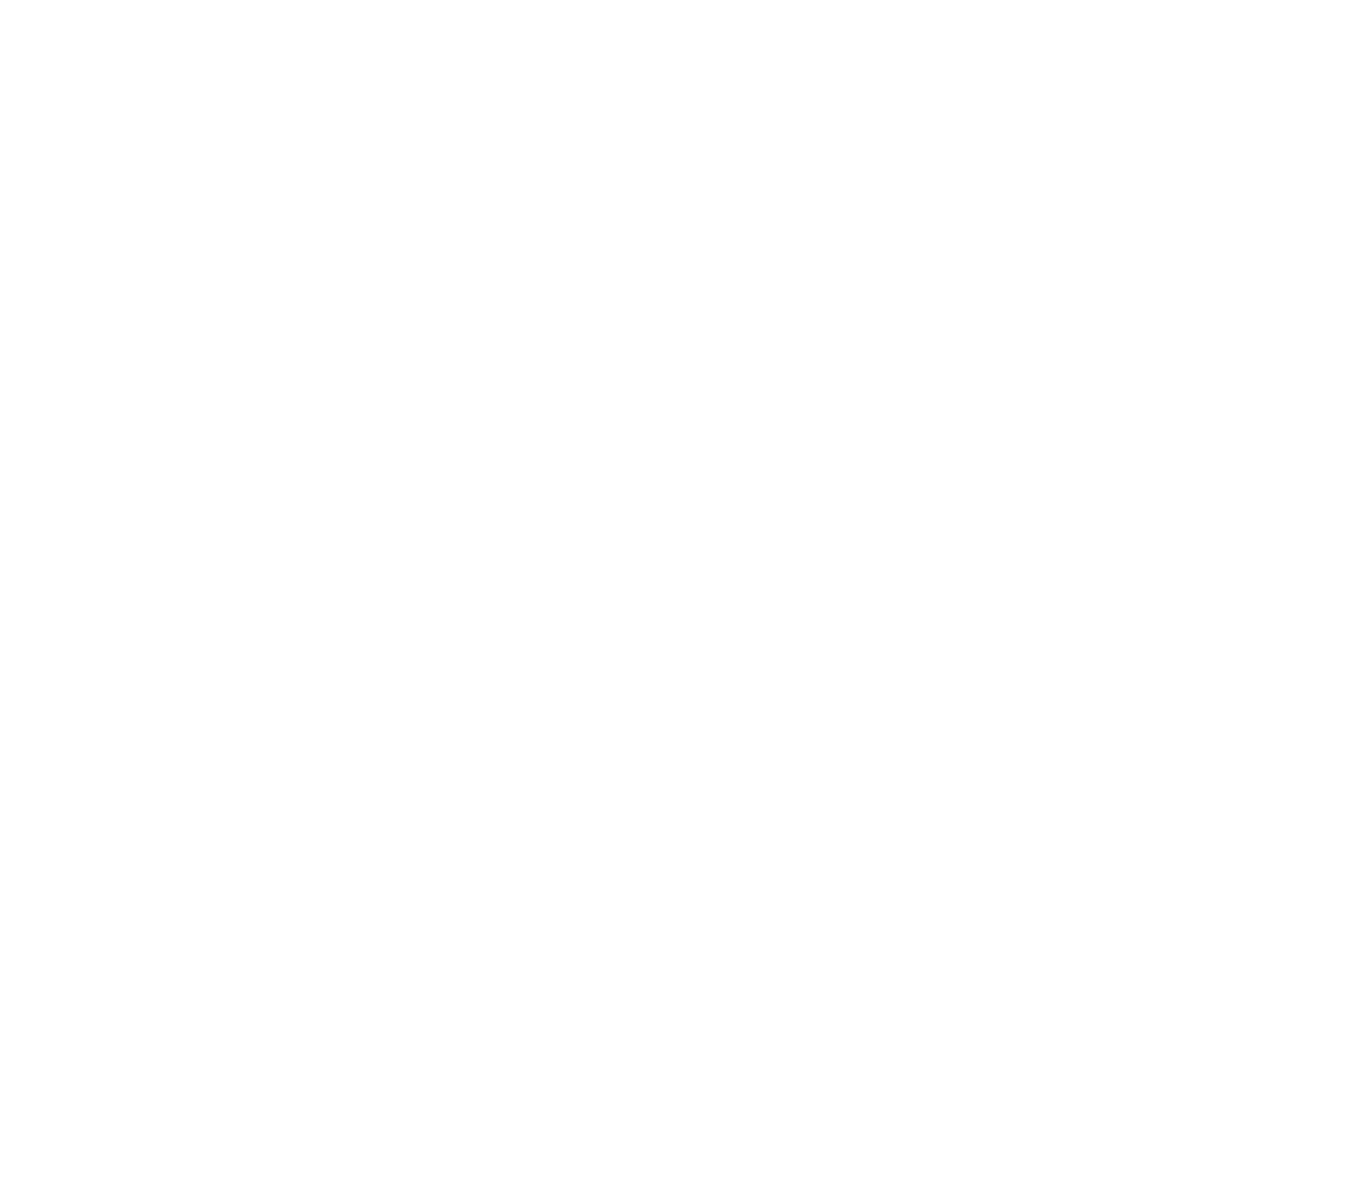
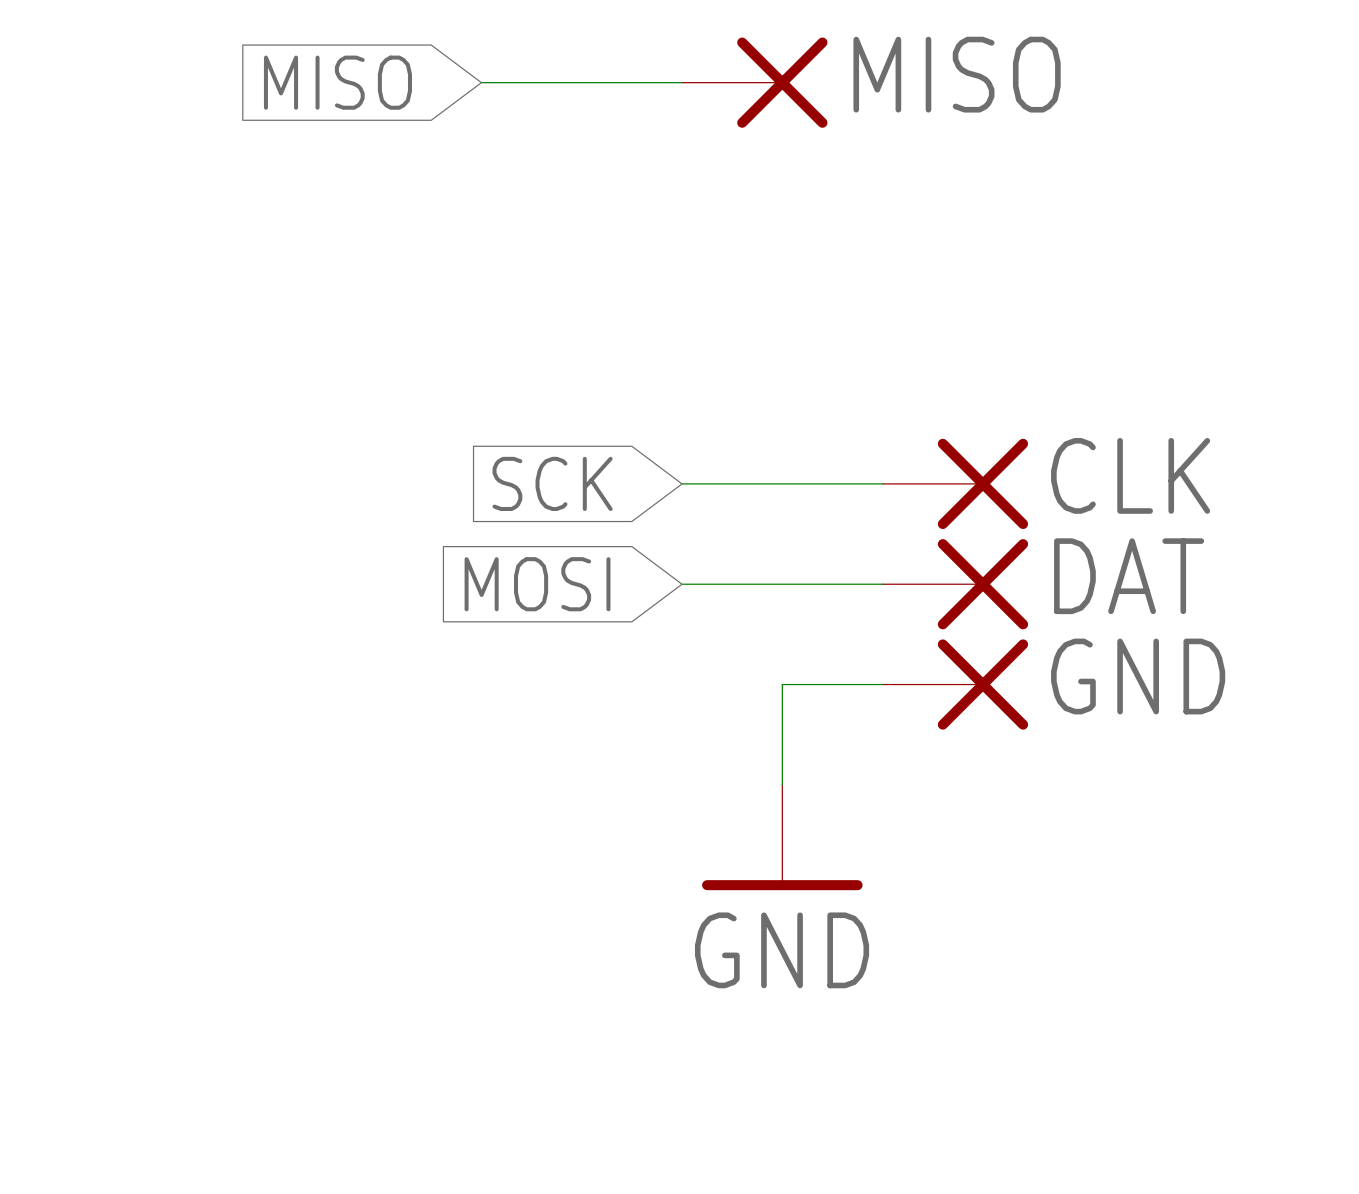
global label: none -> MISO (337, 82)
wire: none -> (481, 82) (682, 82)
MISO: none -> (754, 82)
global label: none -> SCK (552, 483)
wire: none -> (682, 483) (882, 483)
CLK: none -> (955, 483)
global label: none -> MOSI (537, 584)
wire: none -> (682, 584) (882, 584)
DAT: none -> (955, 584)
wire: none -> (882, 684) (782, 684) (782, 784)
GND: none -> (955, 684)
power symbol: none -> GND (782, 837)

